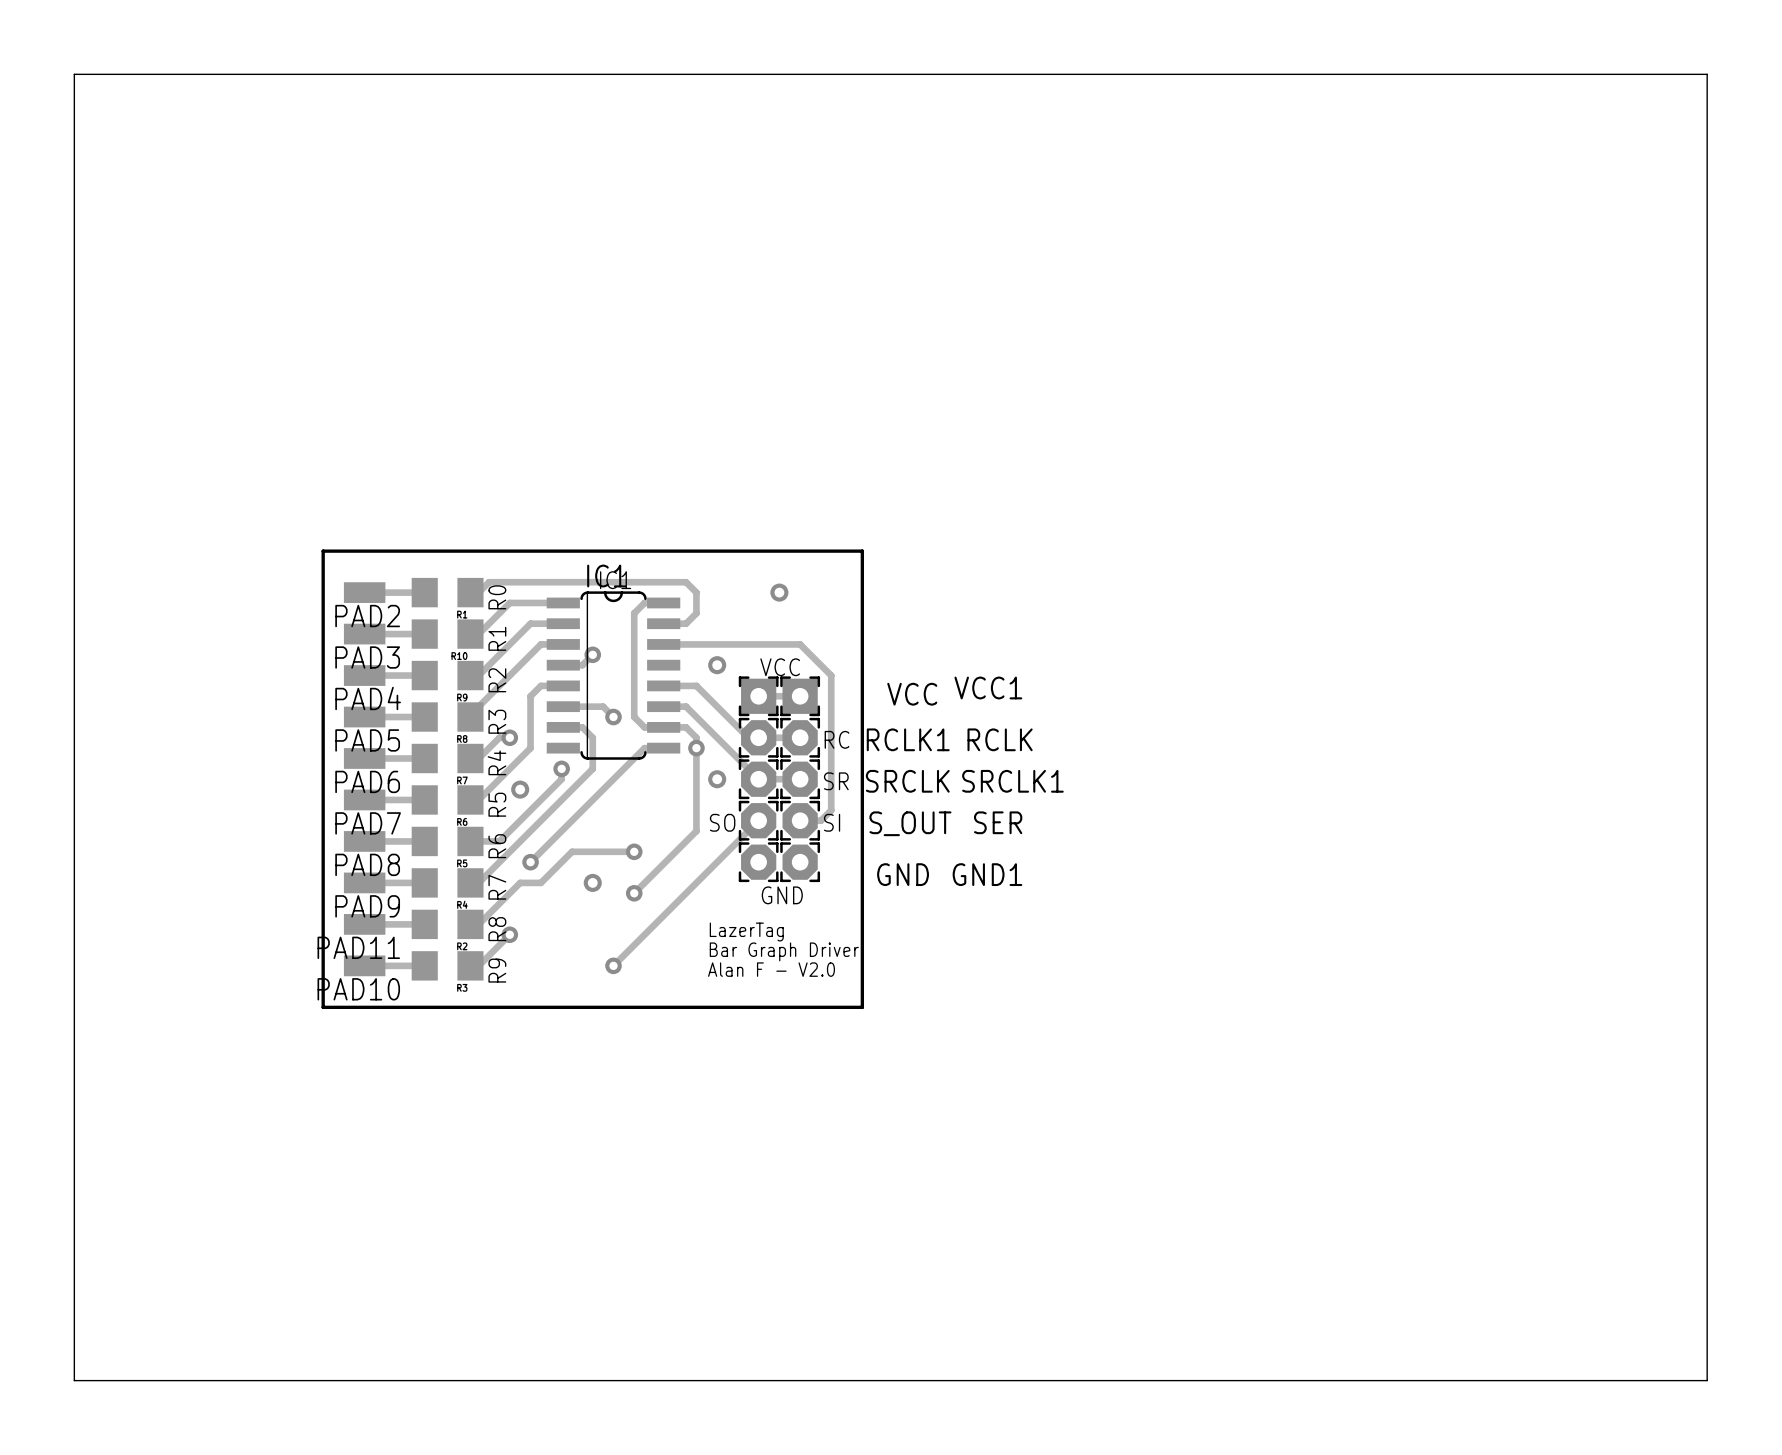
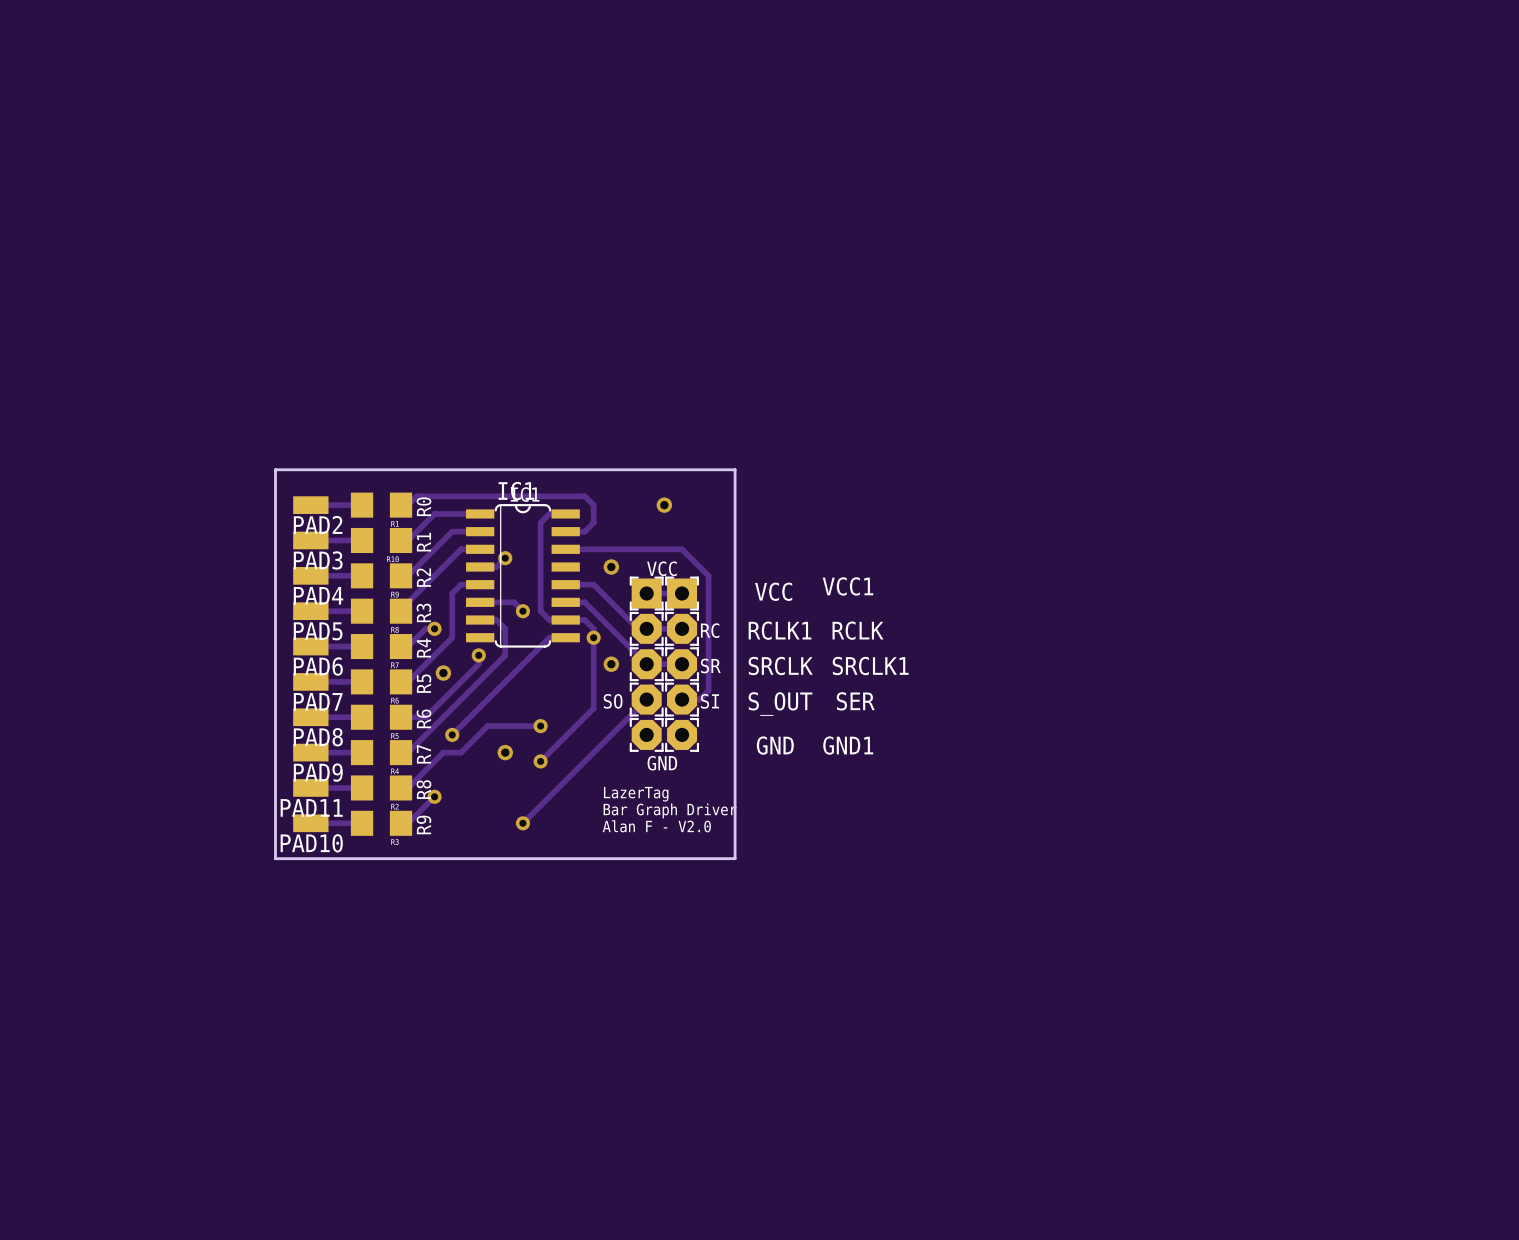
board edge: (74, 74) (1707, 74) (1707, 1380) (74, 1380) (74, 74) -> none

